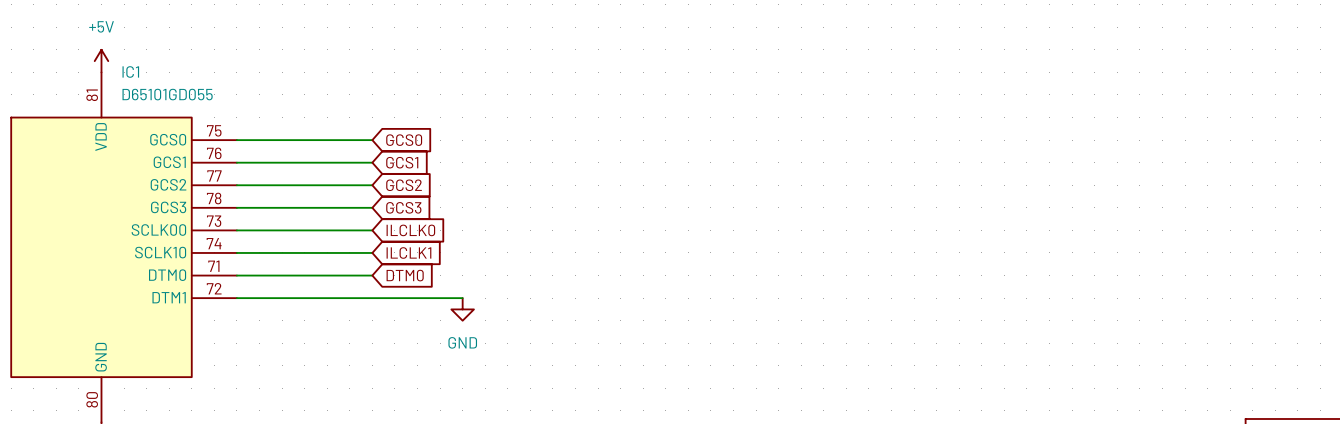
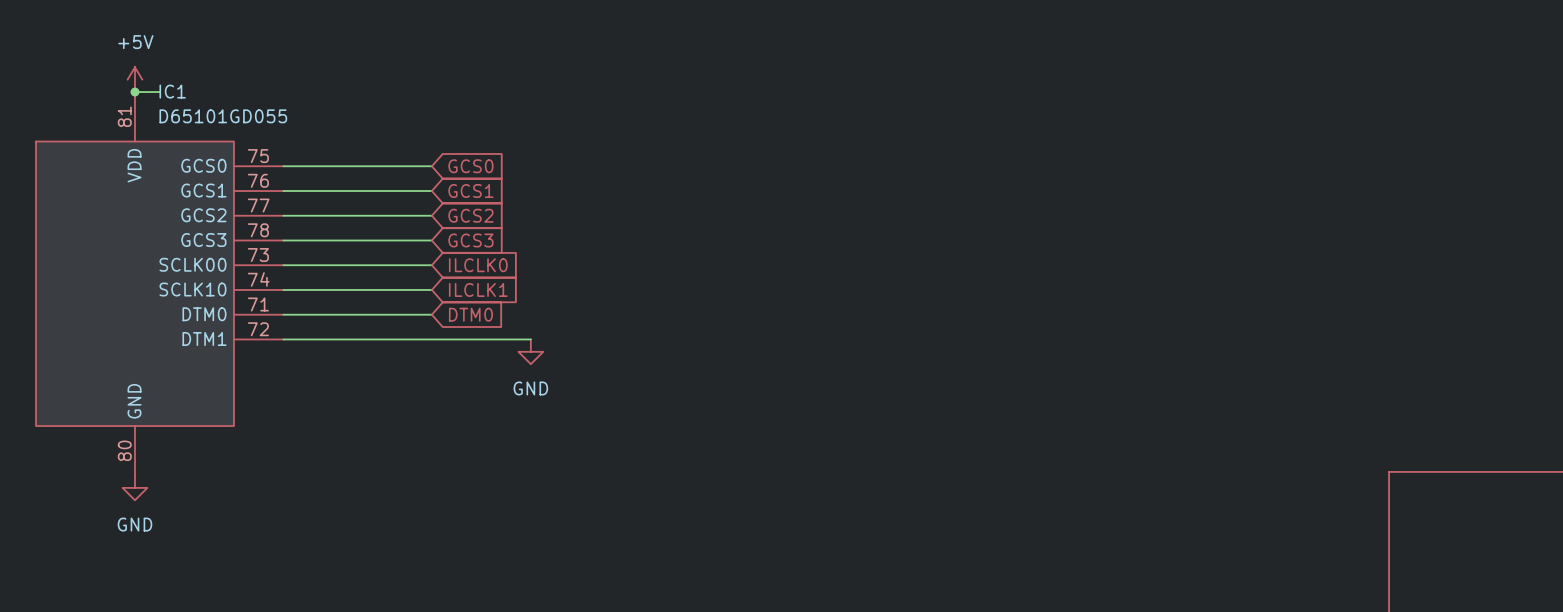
wire: none -> (134, 92) (159, 92)
junction: none -> (134, 92)

